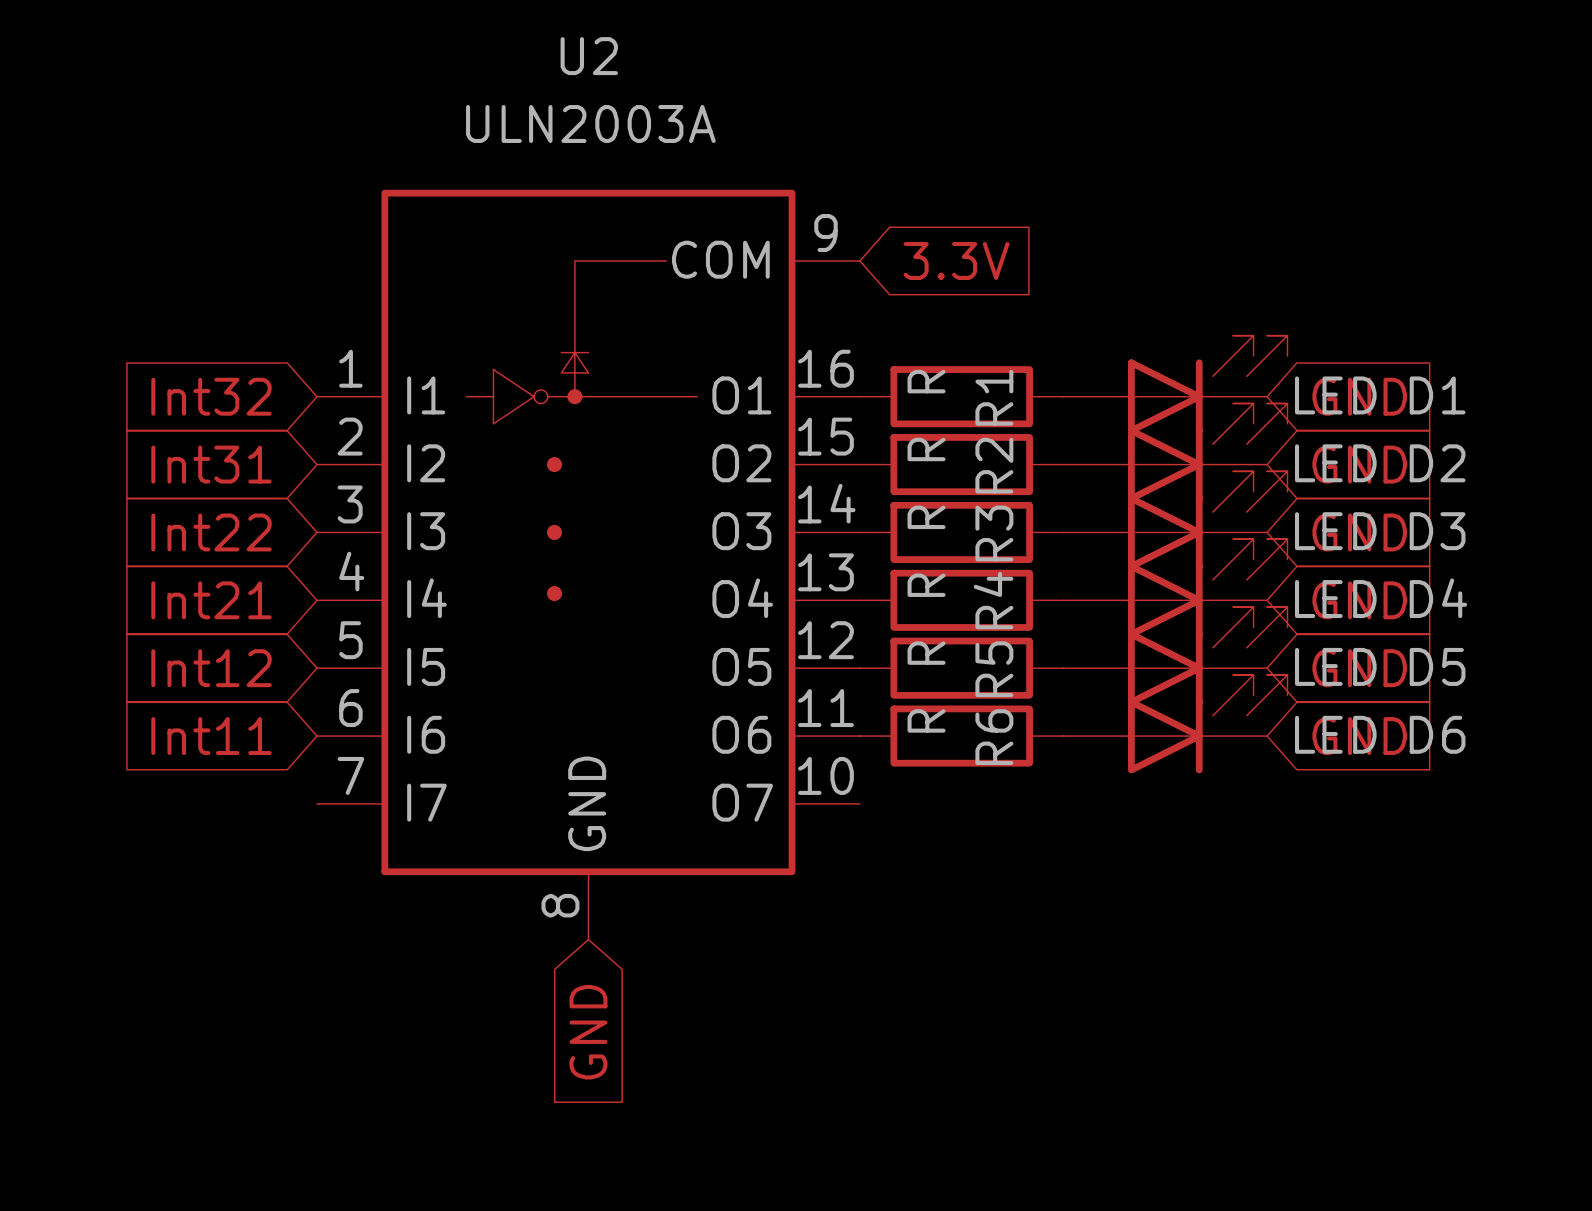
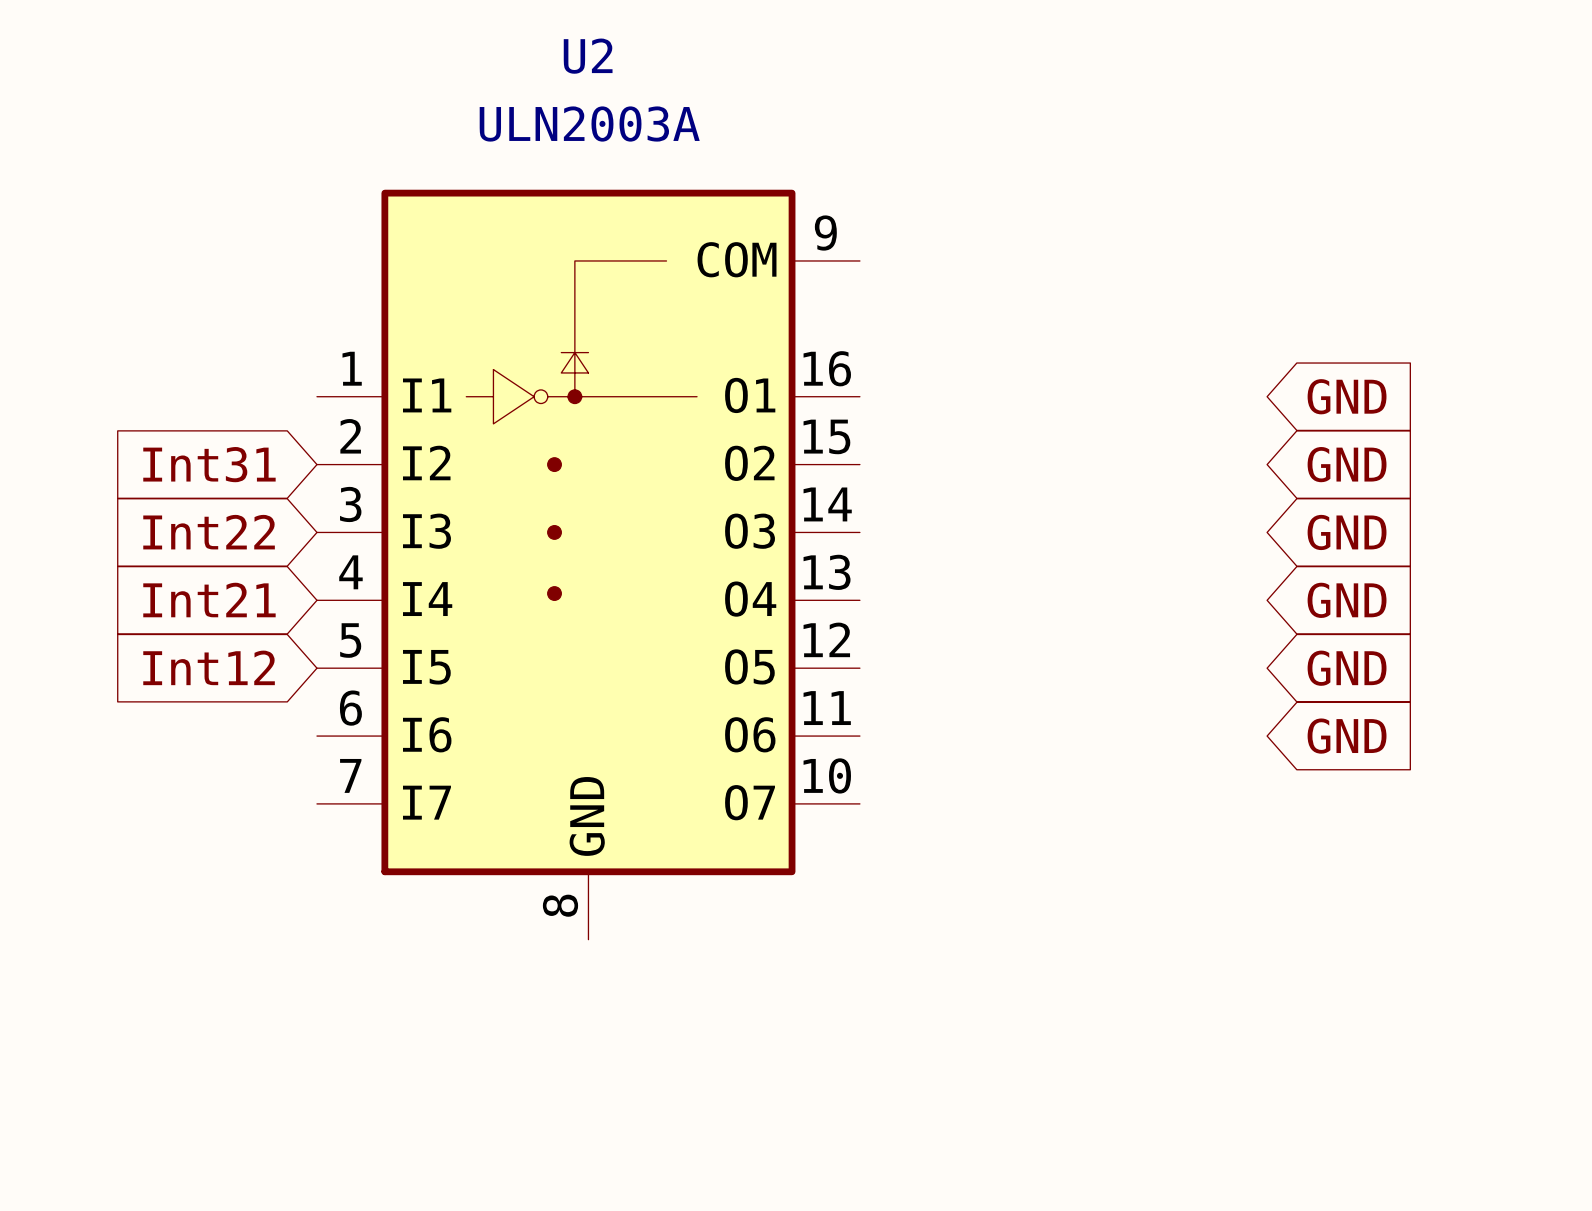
global label: 3.3V (956, 260) -> none
D1: LED (1175, 384) -> none
global label: Int32 (211, 396) -> none
R1: R (961, 396) -> none
D2: LED (1175, 452) -> none
R2: R (961, 464) -> none
D3: LED (1175, 520) -> none
R3: R (961, 532) -> none
D4: LED (1175, 588) -> none
R4: R (961, 600) -> none
D5: LED (1175, 656) -> none
R5: R (961, 668) -> none
D6: LED (1175, 724) -> none
global label: Int11 (211, 736) -> none
R6: R (961, 736) -> none
global label: GND (588, 1032) -> none

